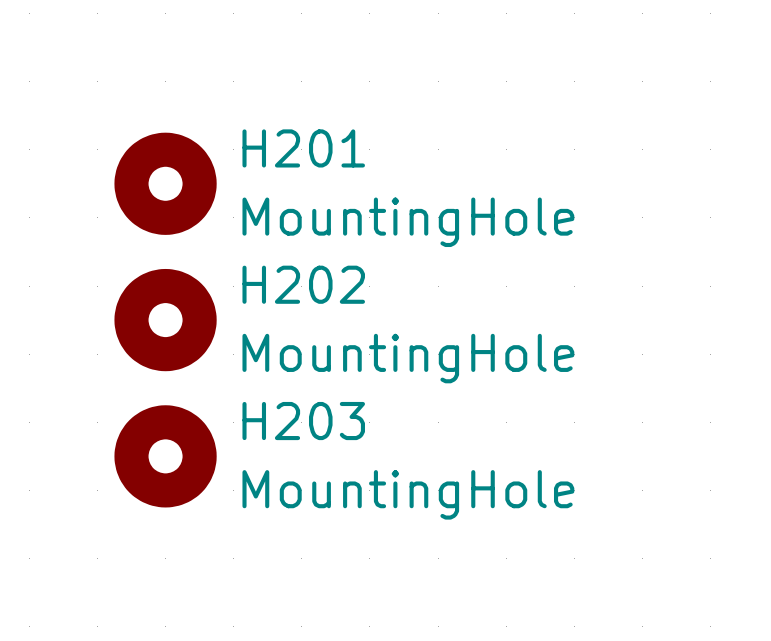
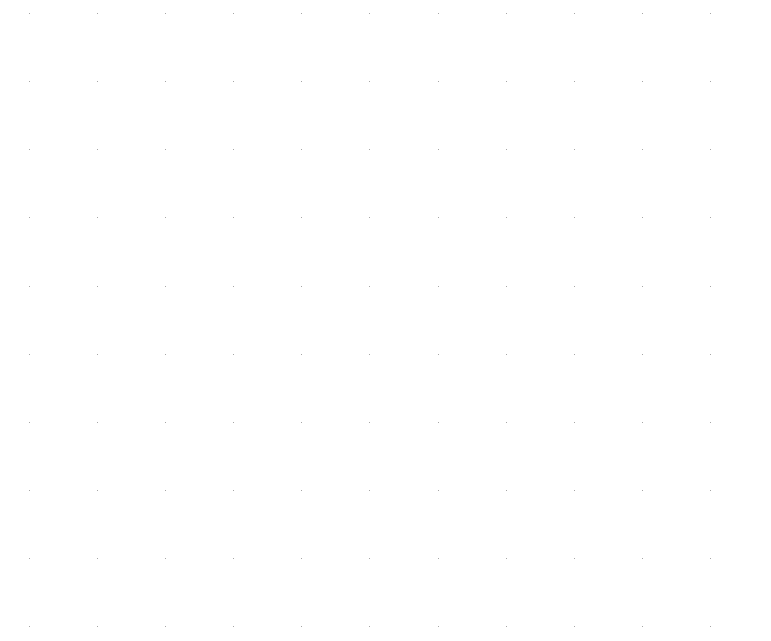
H201: MountingHole (165, 183) -> none
H202: MountingHole (165, 320) -> none
H203: MountingHole (165, 456) -> none

